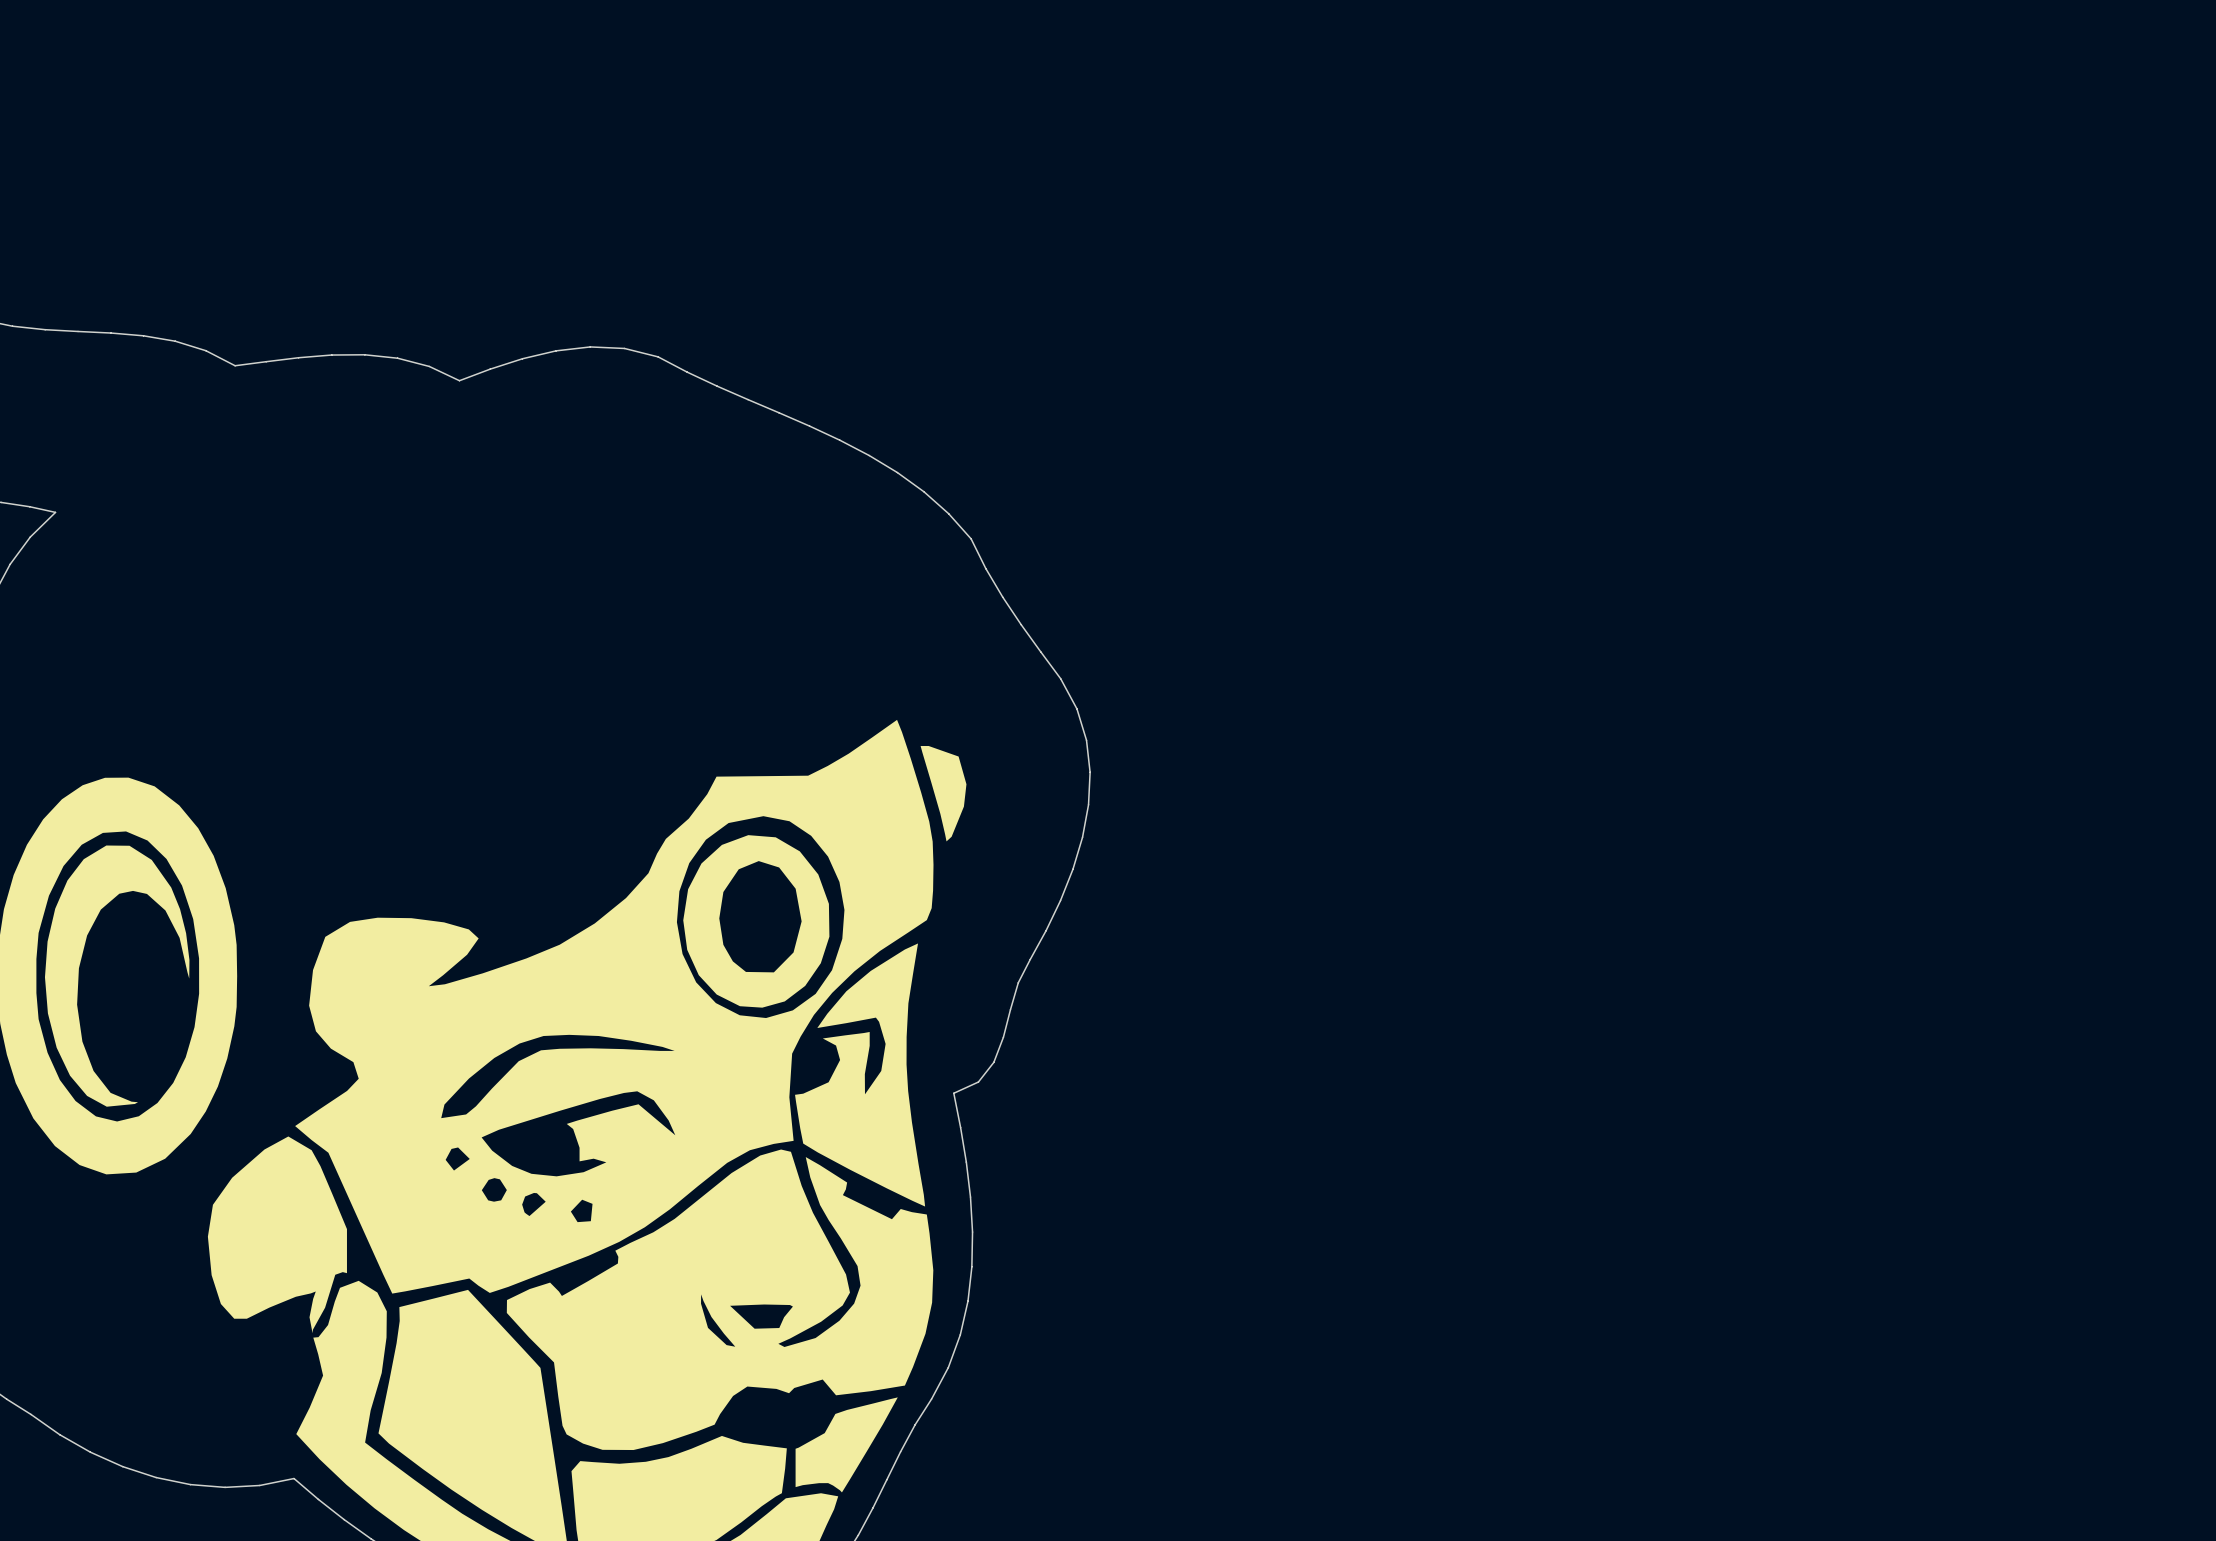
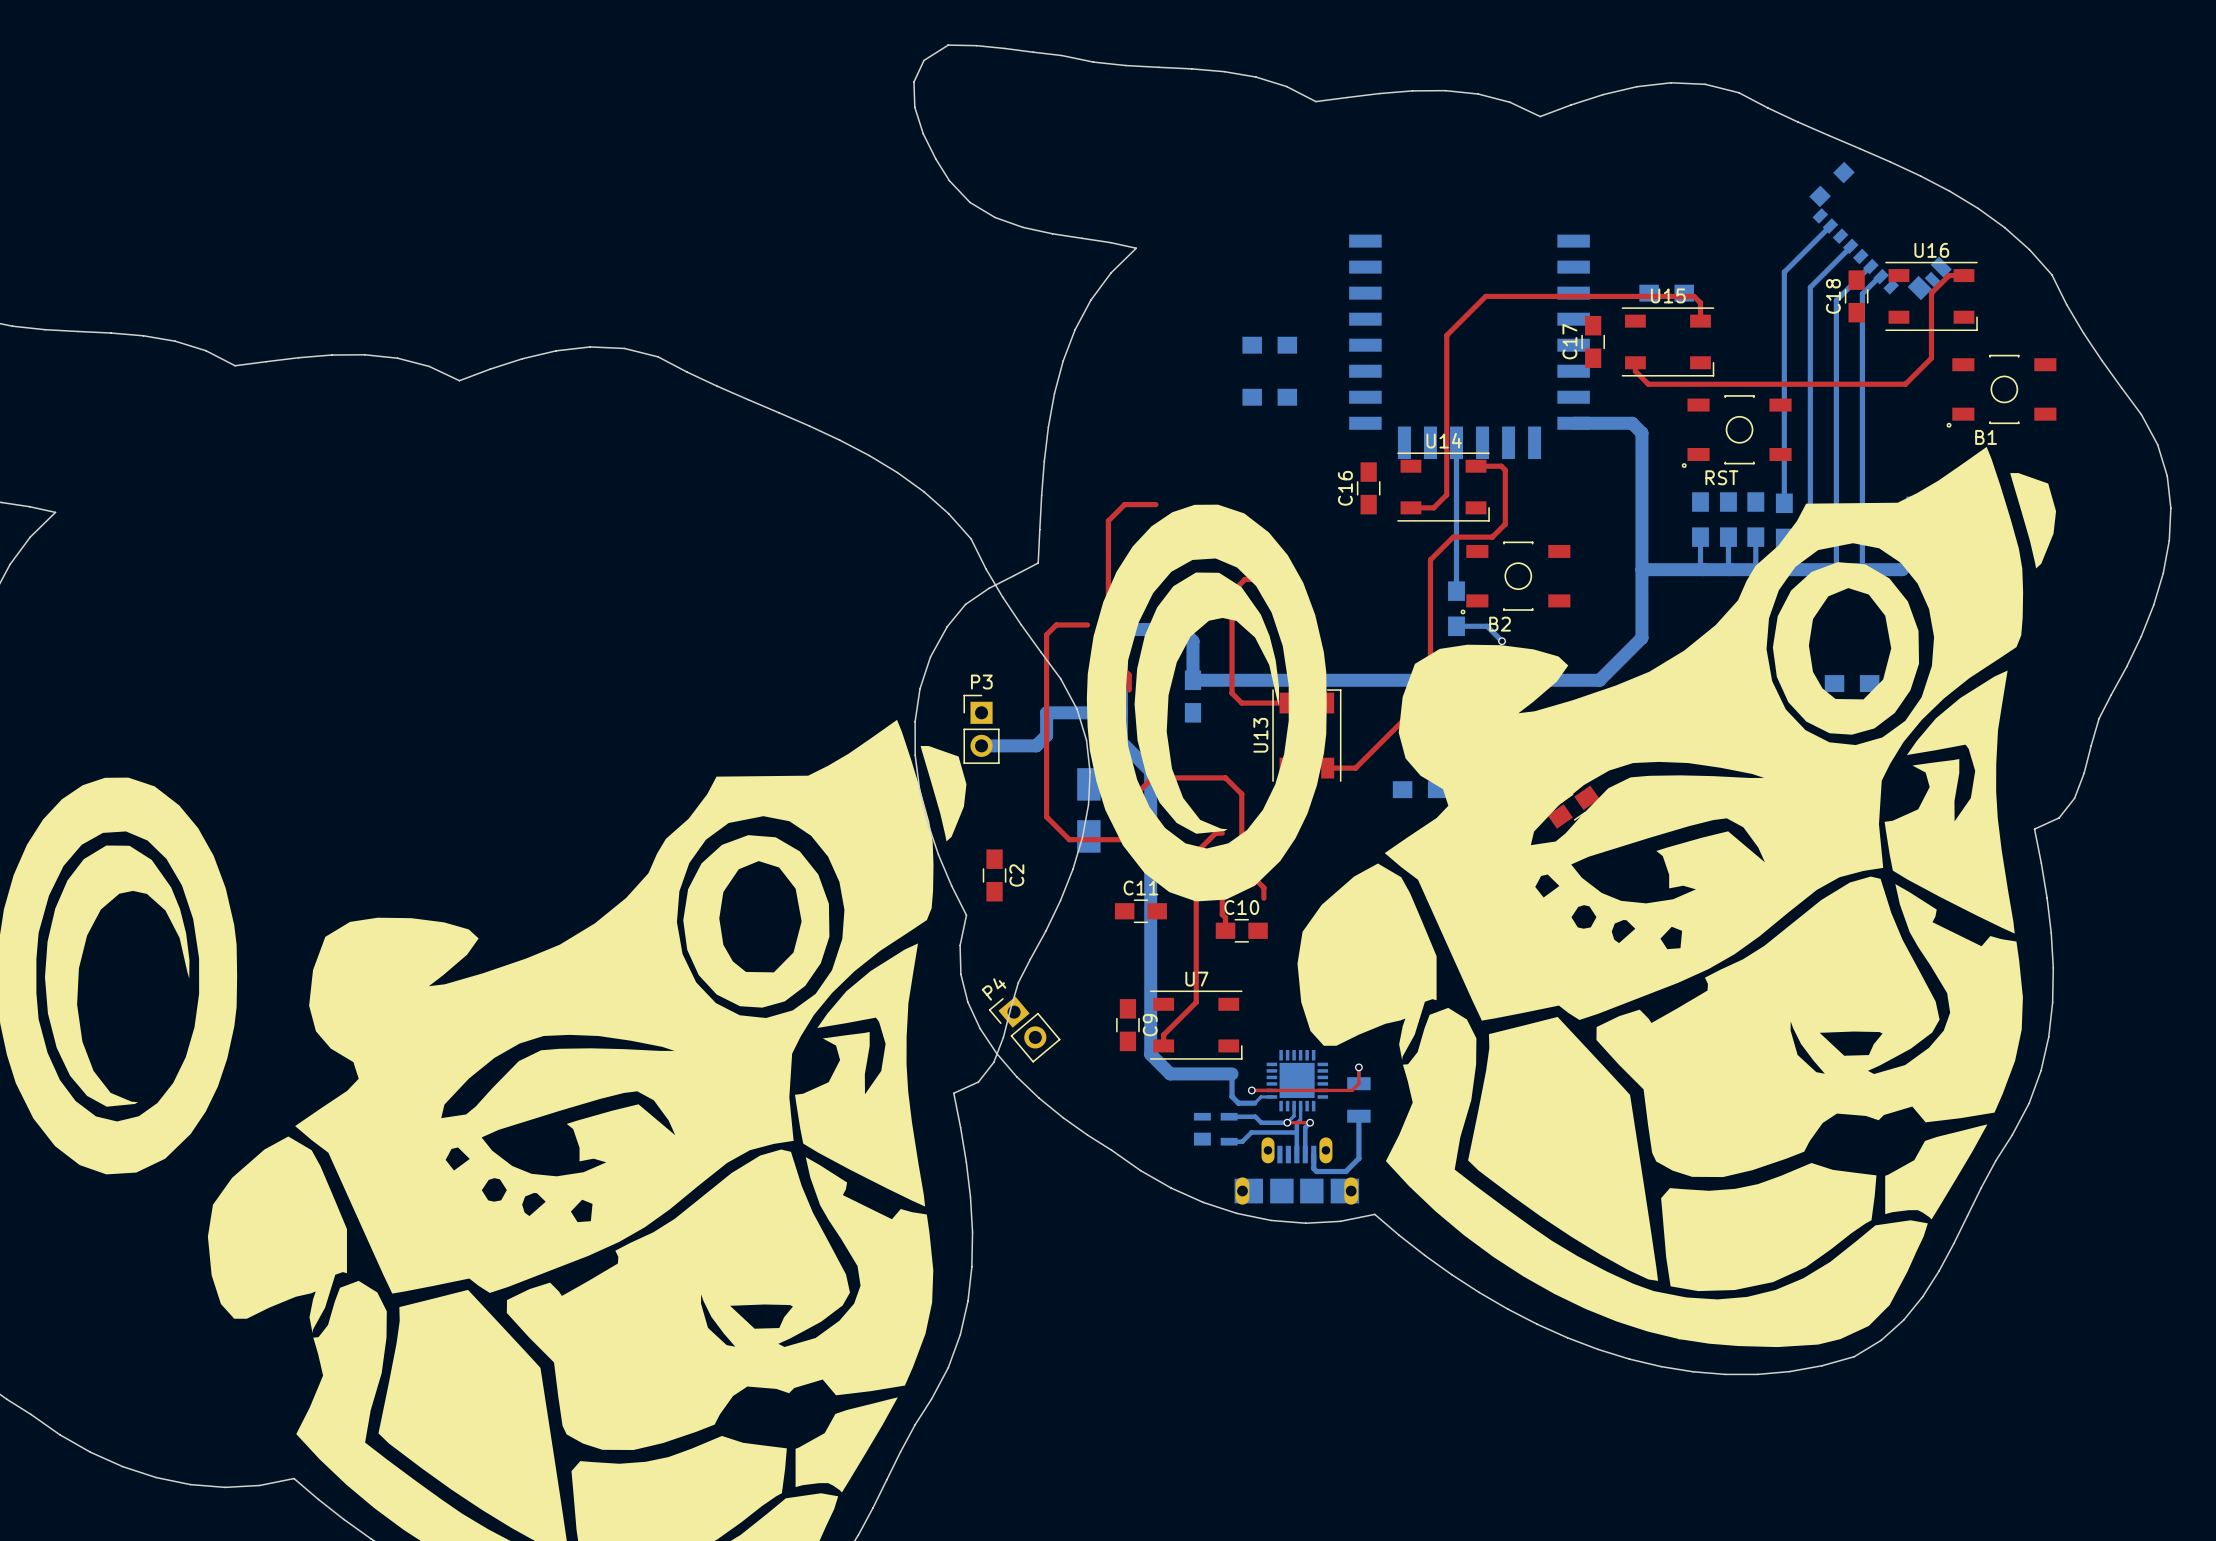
drawing: none -> [913, 44, 2172, 1376]
bottom track: none -> (1830, 226) (1784, 272) (1784, 503)
part: none -> (1880, 231)
bottom track: none -> (1850, 246) (1810, 287) (1810, 503)
bottom track: none -> (1870, 266) (1836, 300) (1836, 503)
top track: none -> (1964, 275) (1949, 275) (1931, 293) (1931, 358) (1905, 384) (1648, 384) (1635, 371) (1635, 362)
bottom track: none -> (1881, 276) (1862, 293) (1862, 503)
part: none -> (1666, 293)
C18: none -> (1856, 296)
U16: none -> (1931, 296)
top track: none -> (1700, 321) (1700, 302) (1693, 296) (1485, 296) (1446, 335) (1446, 494) (1433, 507) (1410, 507)
C17: none -> (1593, 341)
U15: none -> (1667, 341)
part: none -> (1269, 345)
part: none -> (1469, 346)
part: none -> B1 (2001, 390)
part: none -> (1269, 397)
bottom track: none -> (1573, 423) (1632, 423) (1641, 433) (1641, 637) (1599, 680) (1193, 680) (1193, 641) (1181, 629) (1121, 629) (1121, 742) (1150, 771) (1150, 1054) (1170, 1073) (1232, 1073) (1232, 1096) (1238, 1103) (1254, 1103) (1261, 1096) (1271, 1096)
part: none -> RST (1737, 431)
bottom track: none -> (1456, 442) (1456, 591)
top track: none -> (1476, 466) (1501, 466) (1505, 470) (1505, 524) (1492, 537) (1453, 537) (1430, 559) (1430, 693) (1355, 768) (1327, 768)
U14: none -> (1443, 487)
C16: none -> (1368, 488)
top track: none -> (1155, 504) (1124, 504) (1108, 520) (1108, 654) (1129, 675) (1129, 690)
part: none -> (1700, 519)
part: none -> (1728, 519)
part: none -> (1755, 519)
part: none -> (1784, 520)
bottom track: none -> (1700, 537) (1700, 566) (1703, 569)
bottom track: none -> (1728, 537) (1729, 569)
bottom track: none -> (1755, 537) (1755, 569)
bottom track: none -> (1836, 538) (1837, 569)
bottom track: none -> (1862, 538) (1863, 569)
bottom track: none -> (1914, 538) (1914, 557) (1902, 569) (1641, 569)
part: none -> B2 (1515, 577)
top track: none -> (1298, 605) (1298, 600) (1277, 579) (1245, 579) (1232, 592) (1232, 693) (1241, 703) (1286, 703)
part: none -> (1456, 608)
top track: none -> (1087, 624) (1056, 624) (1046, 634) (1046, 816) (1069, 839) (1147, 839) (1165, 857) (1165, 872)
bottom track: none -> (1456, 626) (1487, 626) (1502, 641)
via: none -> (1502, 641)
part: none -> (1852, 683)
part: none -> (1193, 696)
bottom track: none -> (1090, 712) (1046, 712) (1046, 735) (1036, 745) (981, 745)
P3: none -> (981, 729)
U13: none -> (1306, 735)
part: none -> (1420, 789)
top track: none -> (1123, 807) (1152, 777) (1225, 777) (1241, 794) (1241, 865) (1263, 887) (1263, 898)
part: none -> (1573, 807)
part: none -> (1088, 810)
top track: none -> (1222, 833) (1215, 833) (1196, 852) (1196, 1002) (1163, 1034) (1163, 1045)
C2: none -> (994, 875)
top track: none -> (1222, 898) (1222, 914) (1225, 917) (1225, 930)
C11: none -> (1140, 911)
C10: none -> (1241, 930)
C9: none -> (1127, 1025)
U7: none -> (1196, 1025)
P4: none -> (1024, 1029)
top track: none -> (1358, 1067) (1358, 1083) (1352, 1090) (1251, 1090)
via: none -> (1358, 1067)
part: none -> (1297, 1080)
via: none -> (1251, 1090)
part: none -> (1358, 1099)
bottom track: none -> (1294, 1106) (1294, 1115) (1287, 1122) (1261, 1122) (1255, 1116) (1229, 1116)
bottom track: none -> (1300, 1106) (1300, 1119) (1296, 1122) (1296, 1154)
bottom track: none -> (1358, 1116) (1358, 1158) (1345, 1171) (1316, 1171) (1313, 1168) (1313, 1154)
top track: none -> (1287, 1122) (1310, 1122)
via: none -> (1287, 1122)
bottom track: none -> (1310, 1122) (1305, 1127) (1305, 1154)
via: none -> (1310, 1122)
part: none -> (1215, 1129)
bottom track: none -> (1296, 1132) (1251, 1132) (1242, 1141) (1229, 1141)
part: none -> (1296, 1171)

